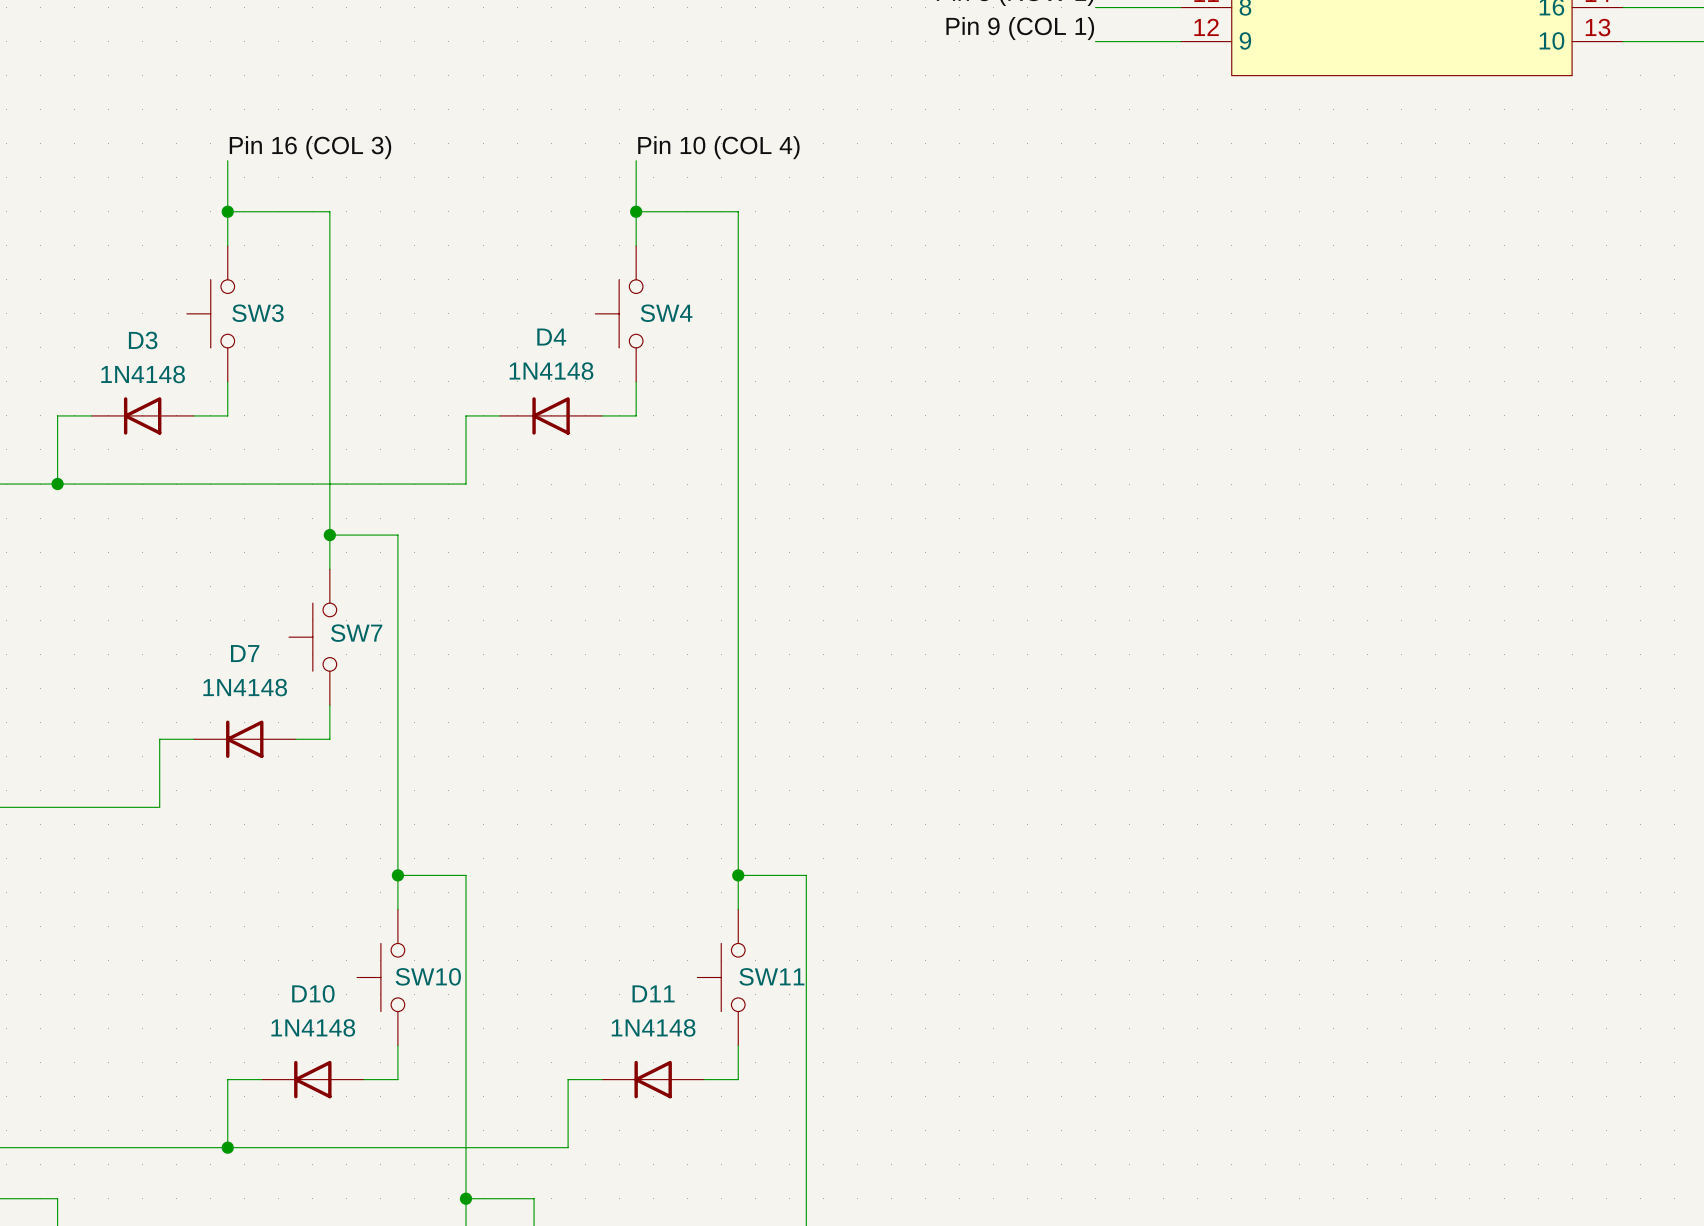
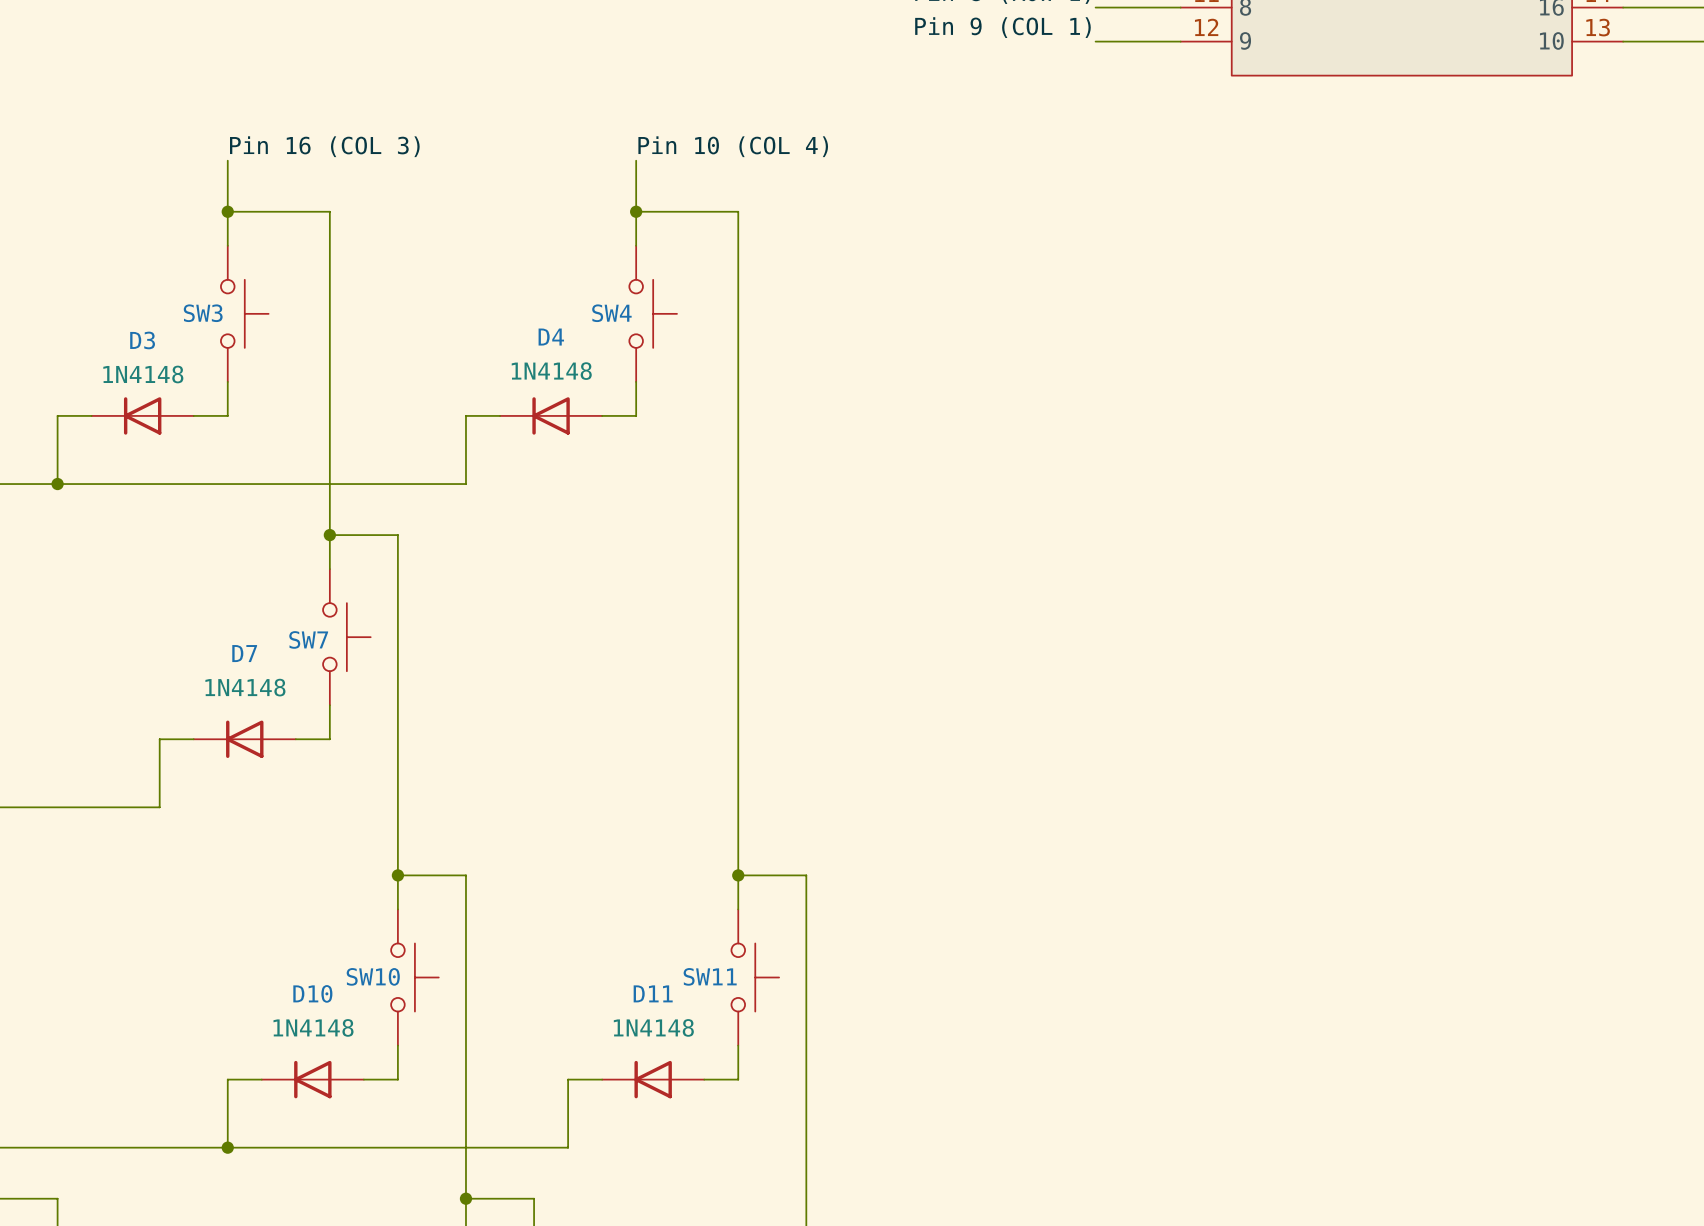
SW3 rotation: 0° (210, 313) -> 180° (244, 313)
SW4 rotation: 0° (619, 313) -> 180° (653, 313)
SW7 rotation: 0° (312, 637) -> 180° (346, 637)
SW10 rotation: 0° (380, 977) -> 180° (414, 977)
SW11 rotation: 0° (721, 977) -> 180° (755, 977)

